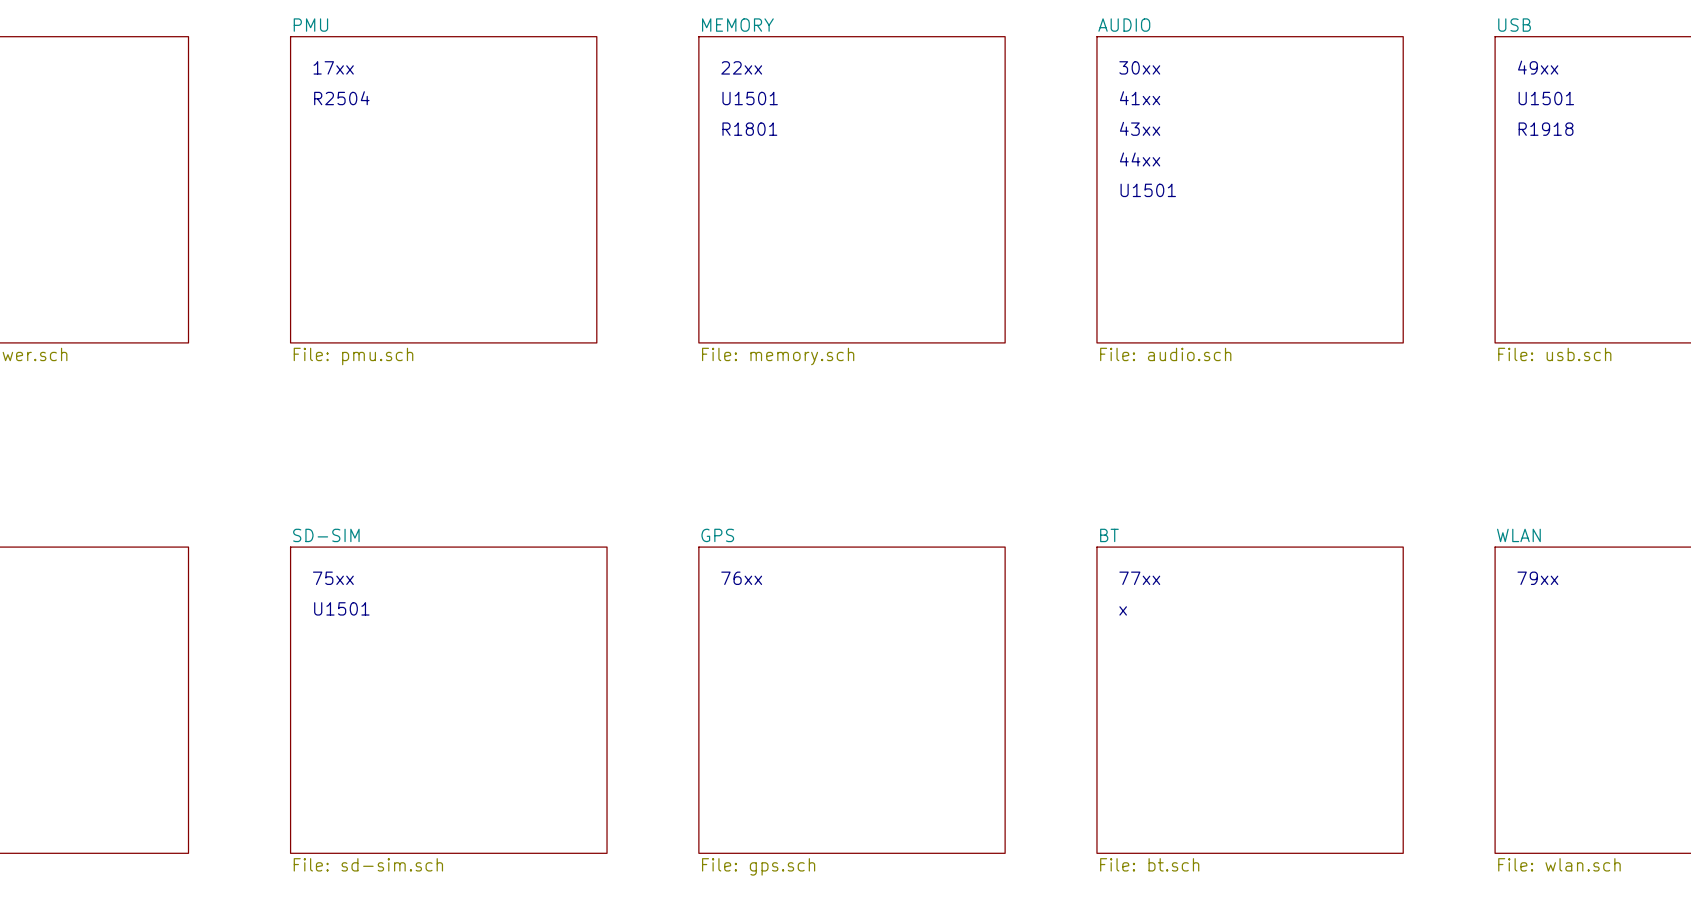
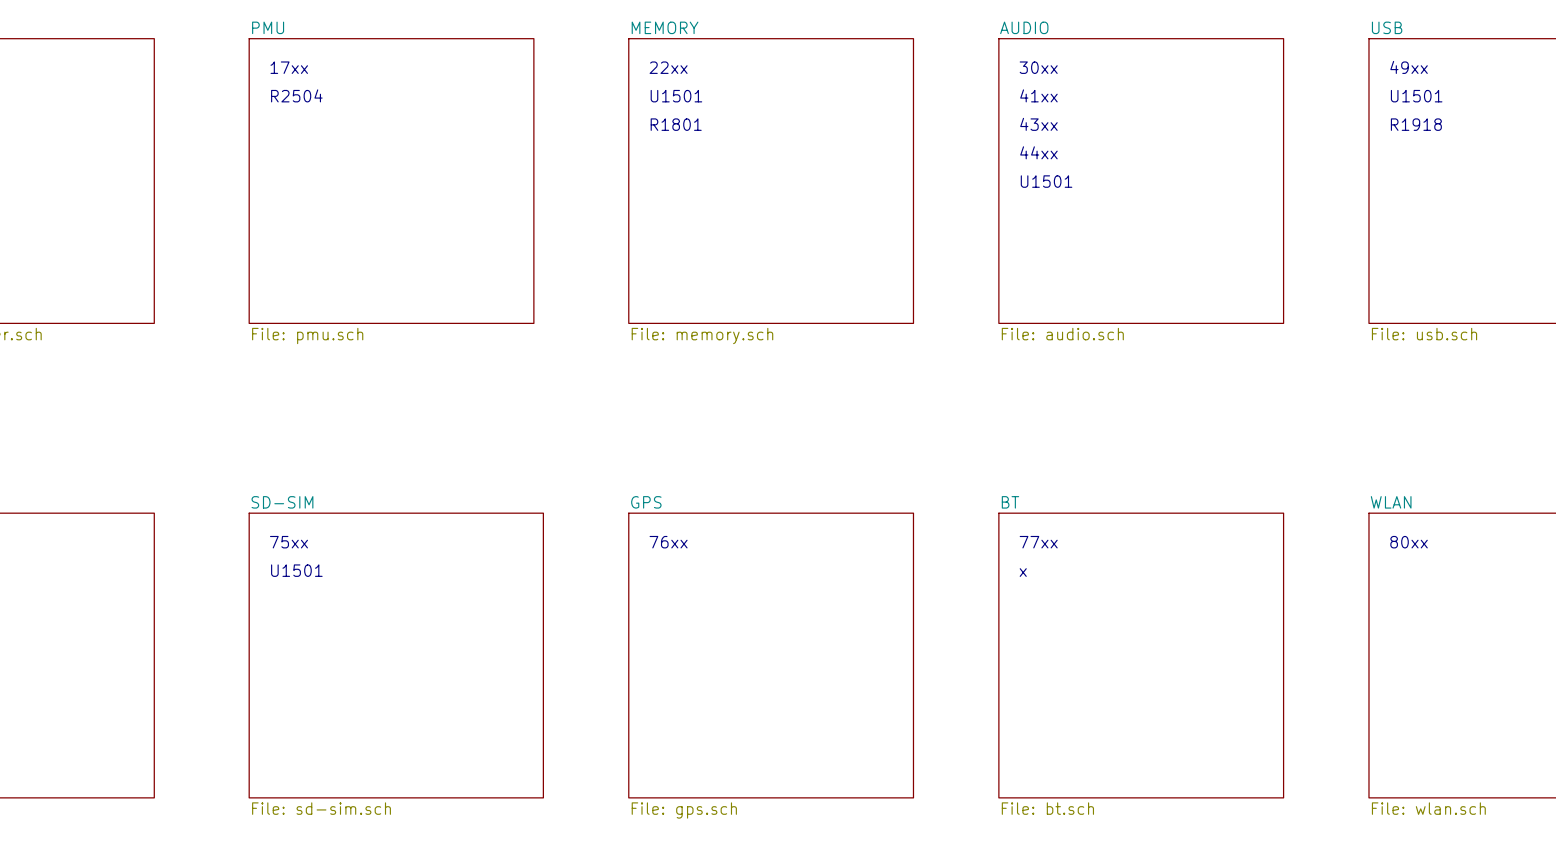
text: 79xx (1537, 578) -> 80xx (1409, 542)

